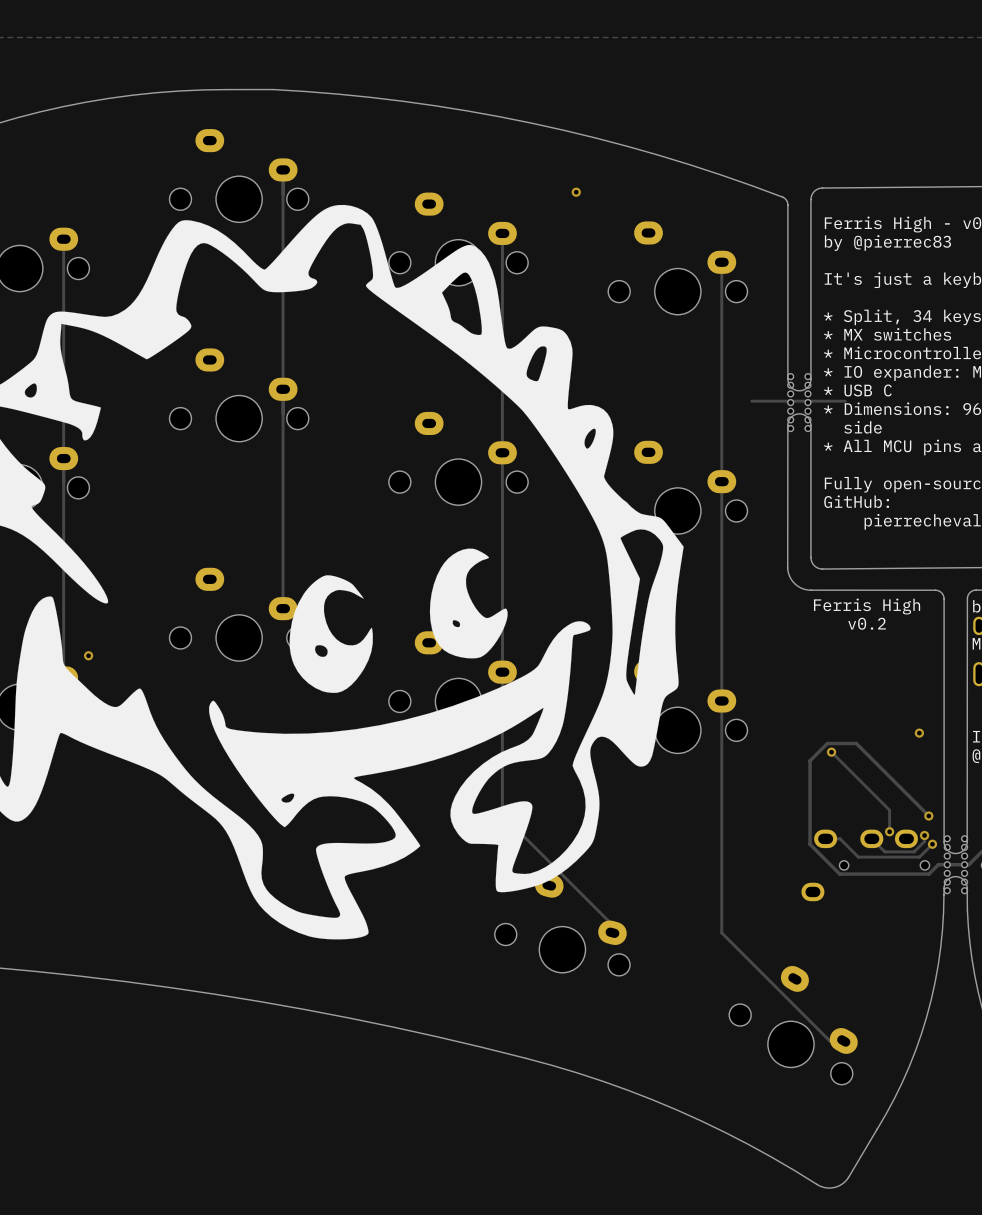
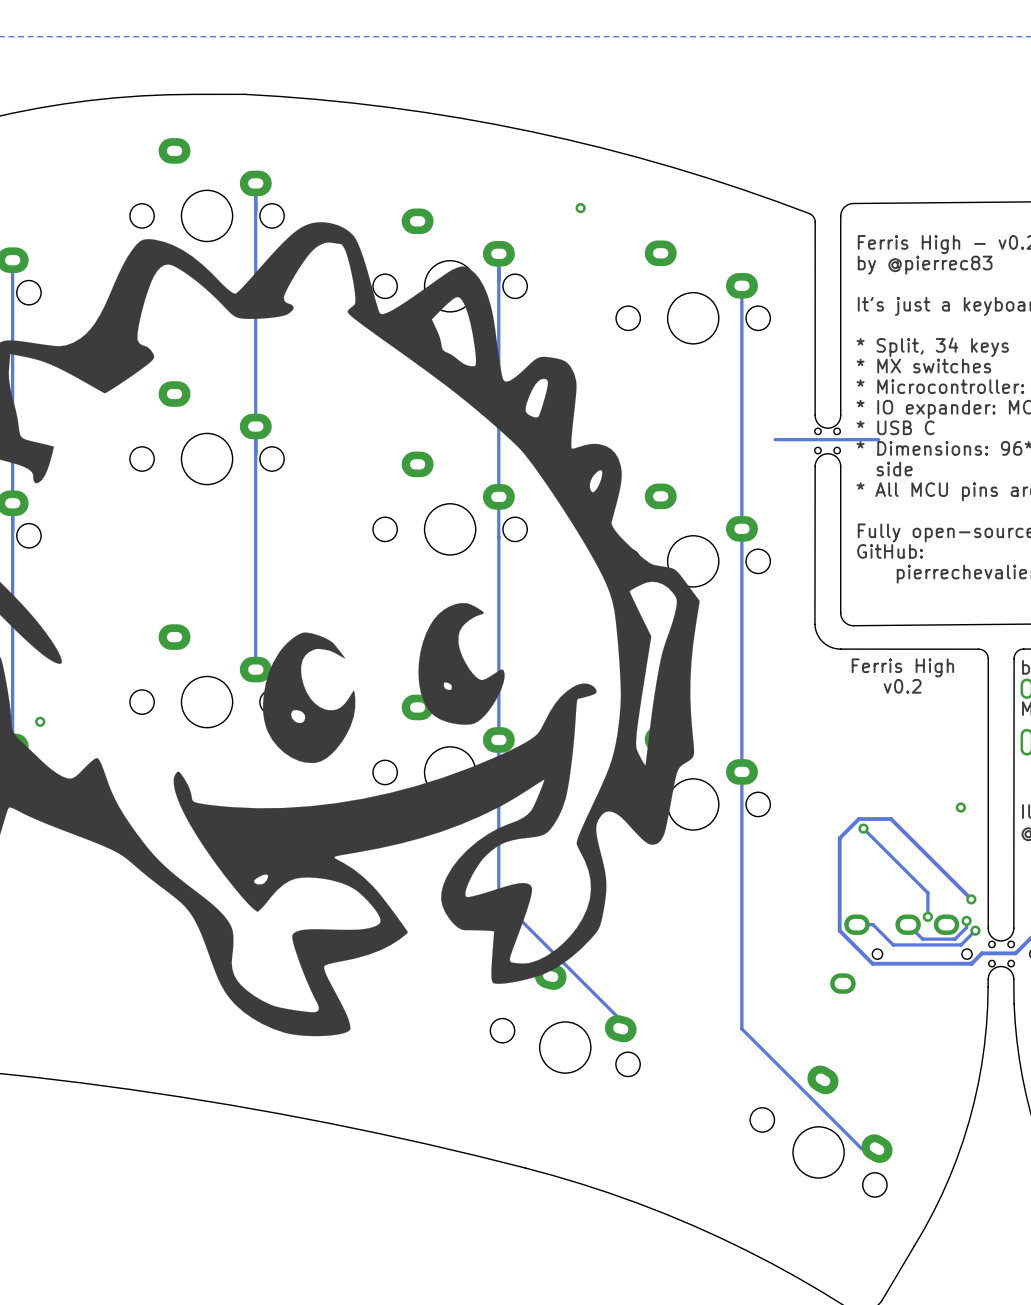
part footprint: [787, 373, 811, 432] -> [814, 428, 841, 454]
part footprint: [944, 835, 968, 894] -> [988, 941, 1015, 967]

